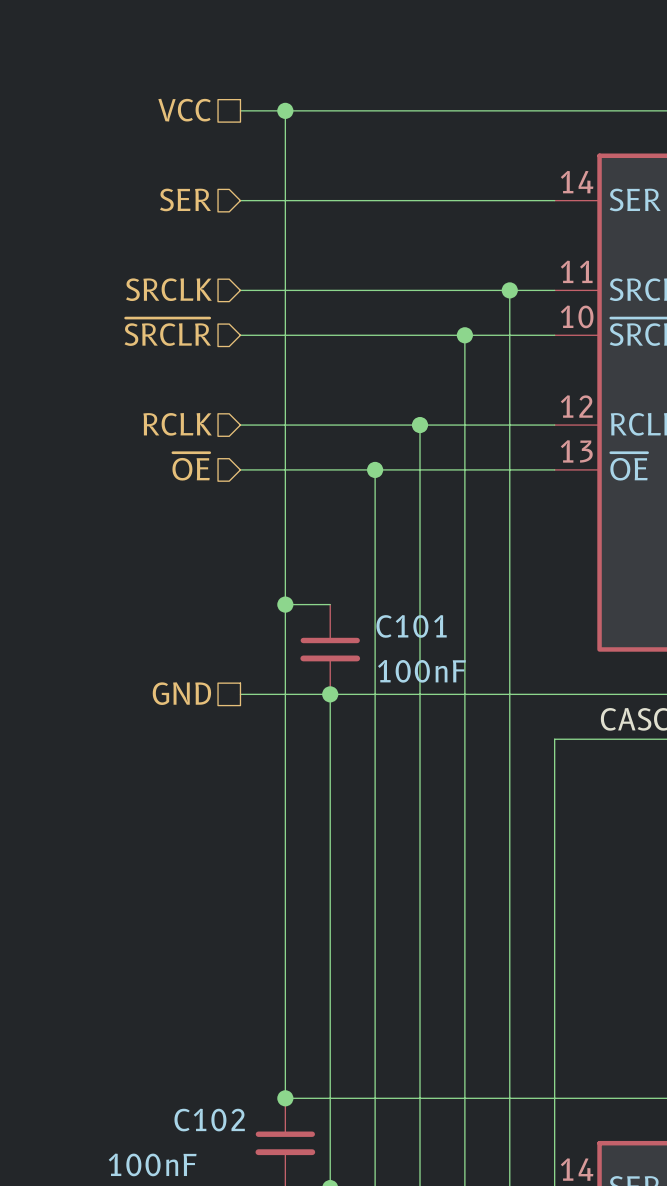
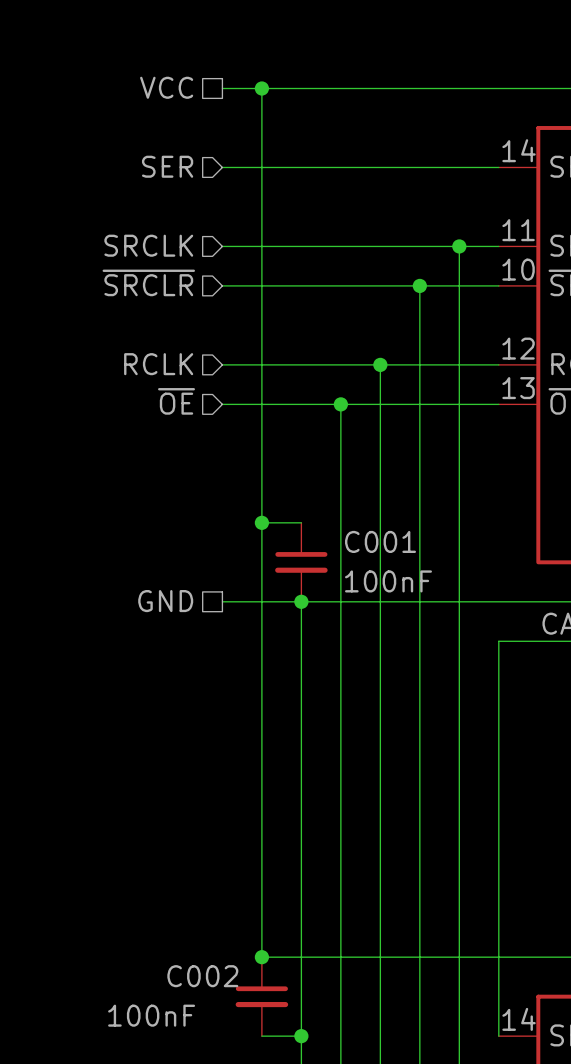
C101 name: C101 (411, 626) -> C001 (380, 541)
C102 name: C102 (209, 1120) -> C002 (202, 976)

